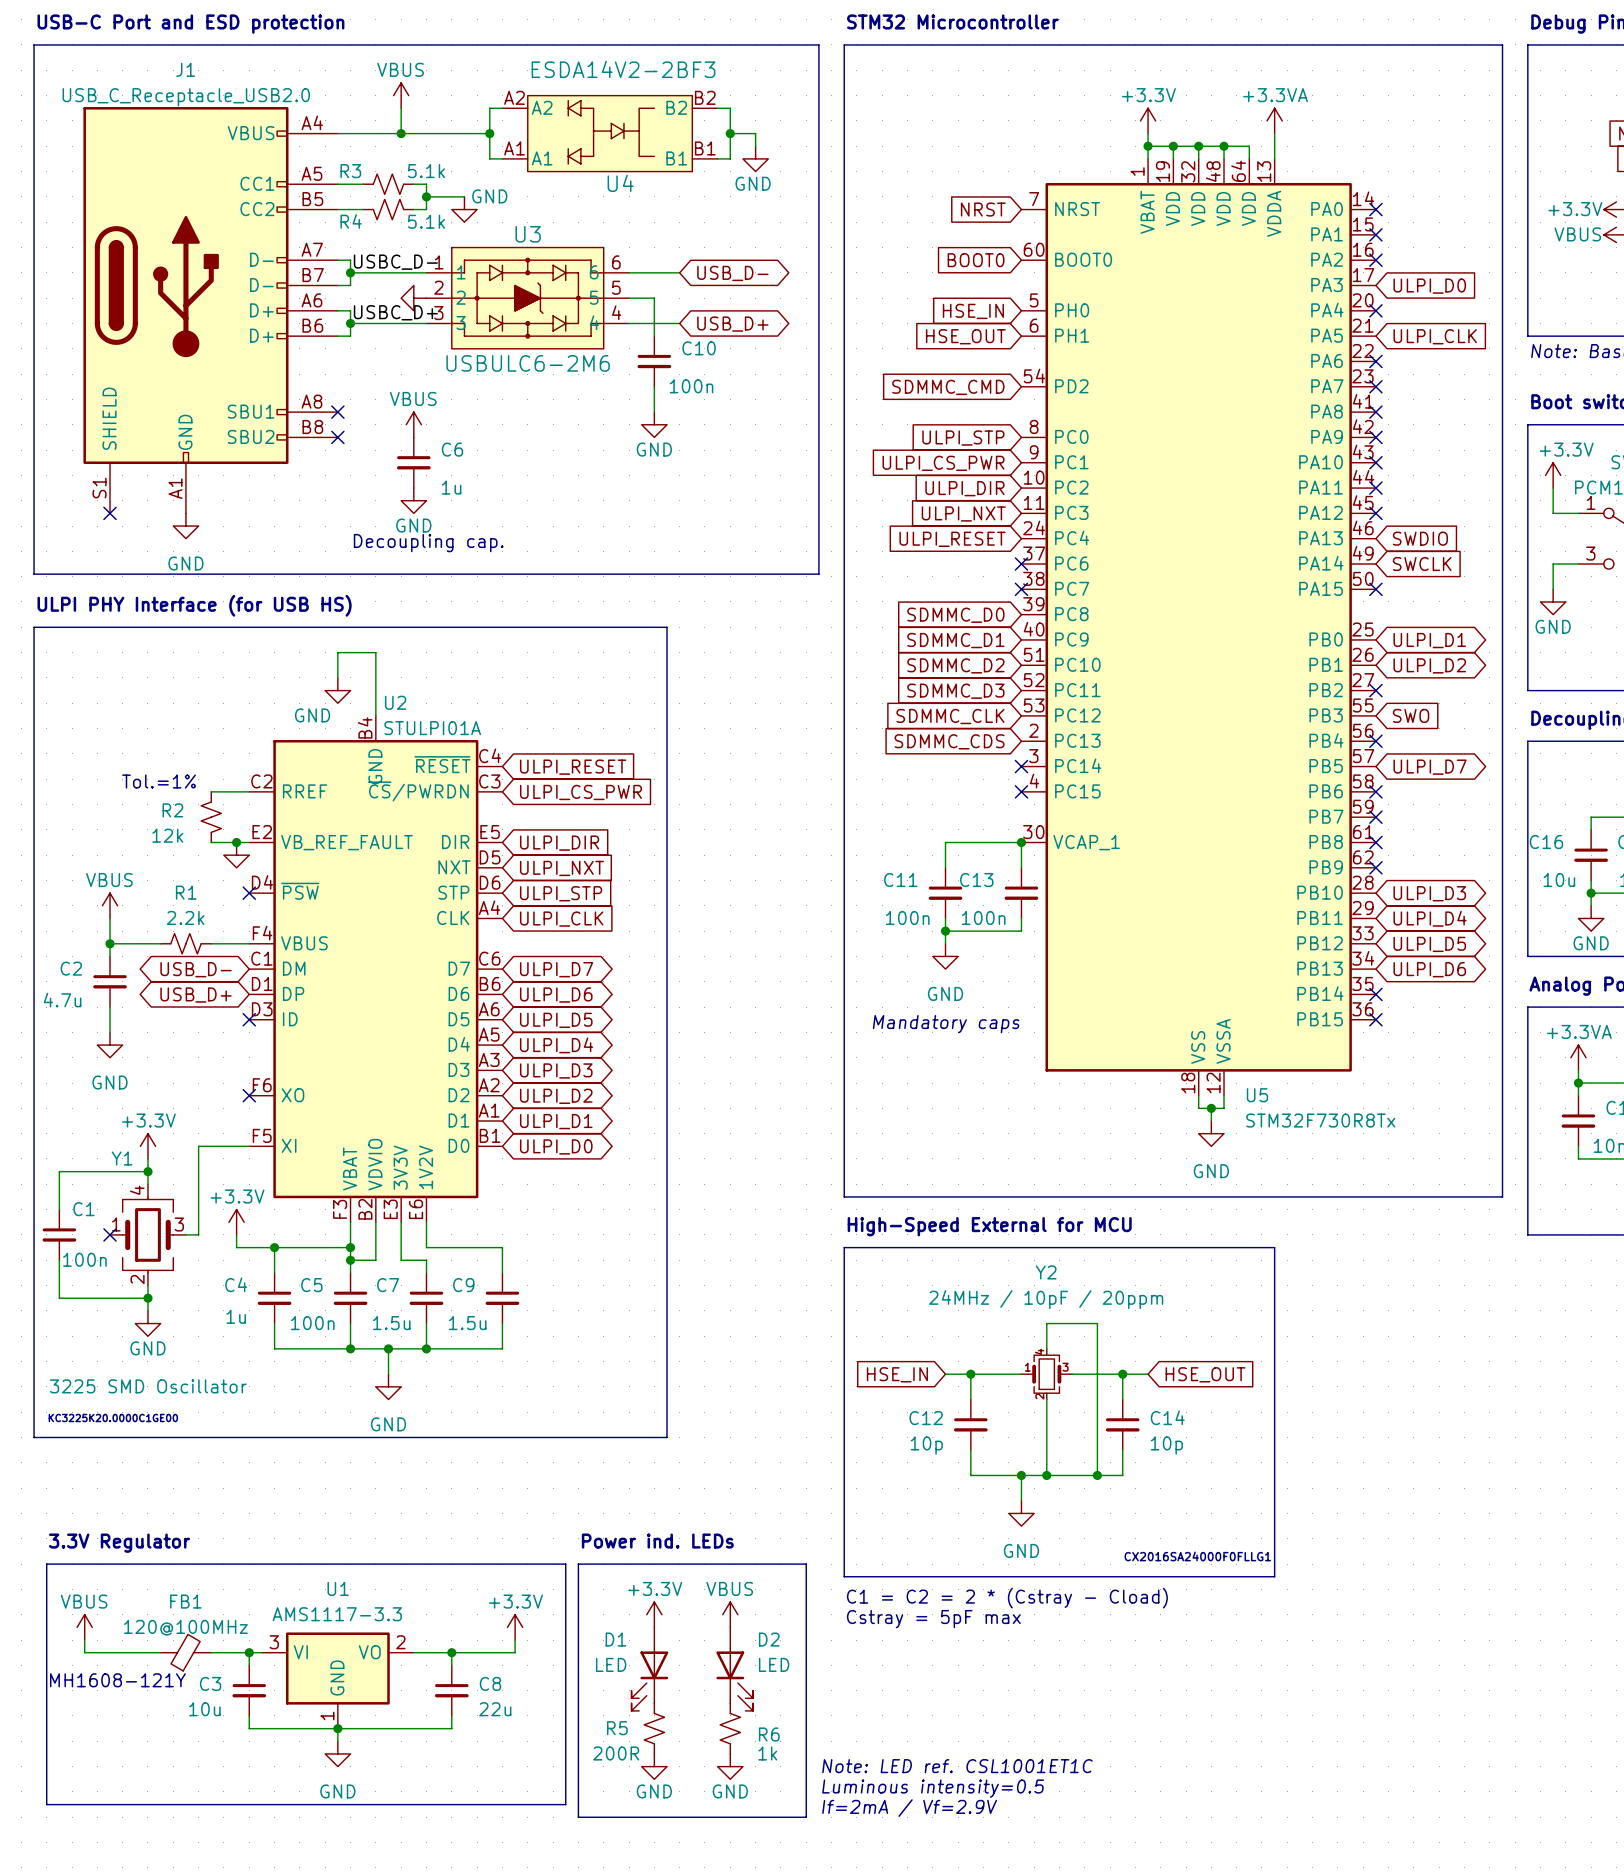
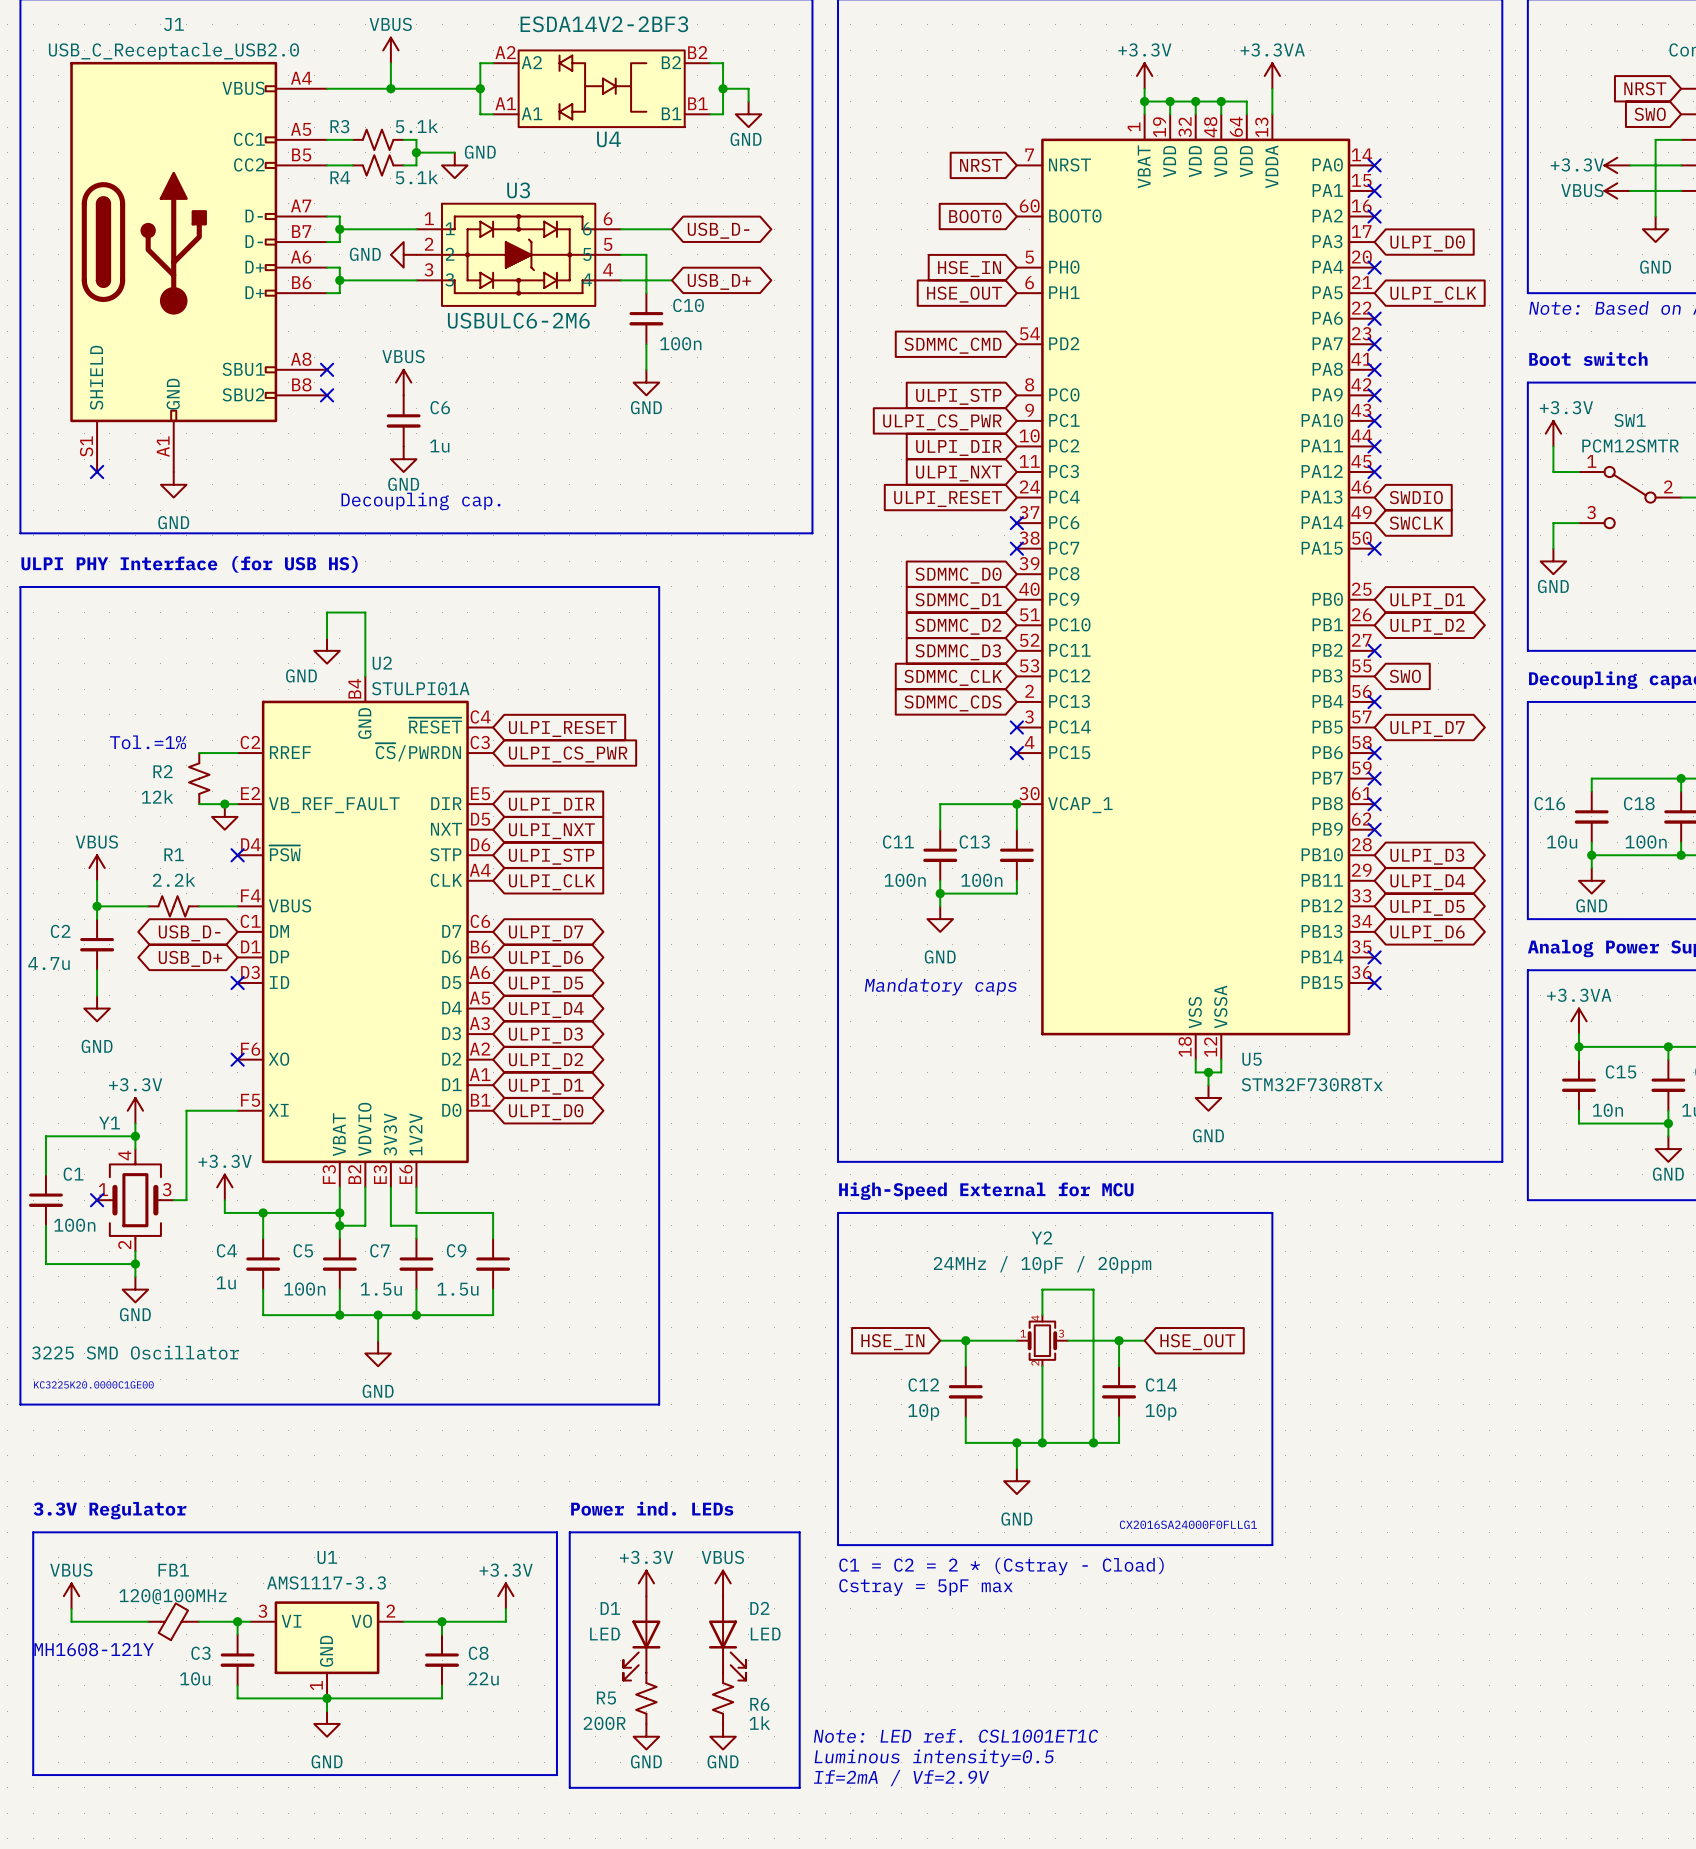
label: USBC_D- (395, 262) -> none
power symbol text: none -> GND (365, 254)
label: USBC_D+ (395, 312) -> none

